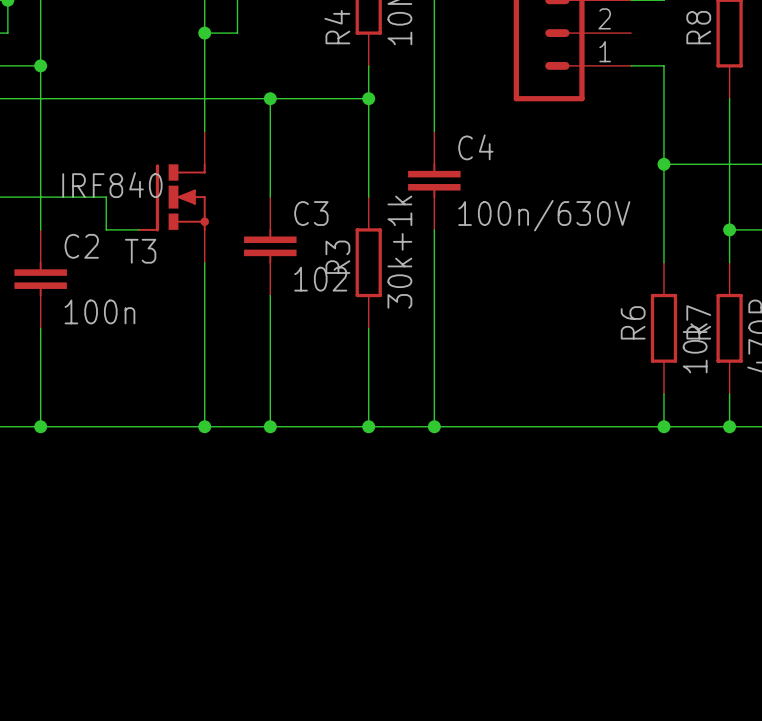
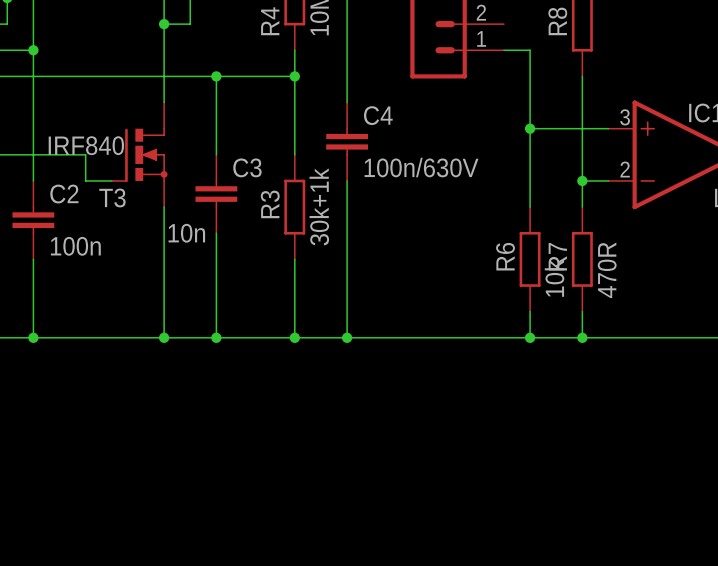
C3 value: 102 (320, 279) -> 10n (186, 233)

